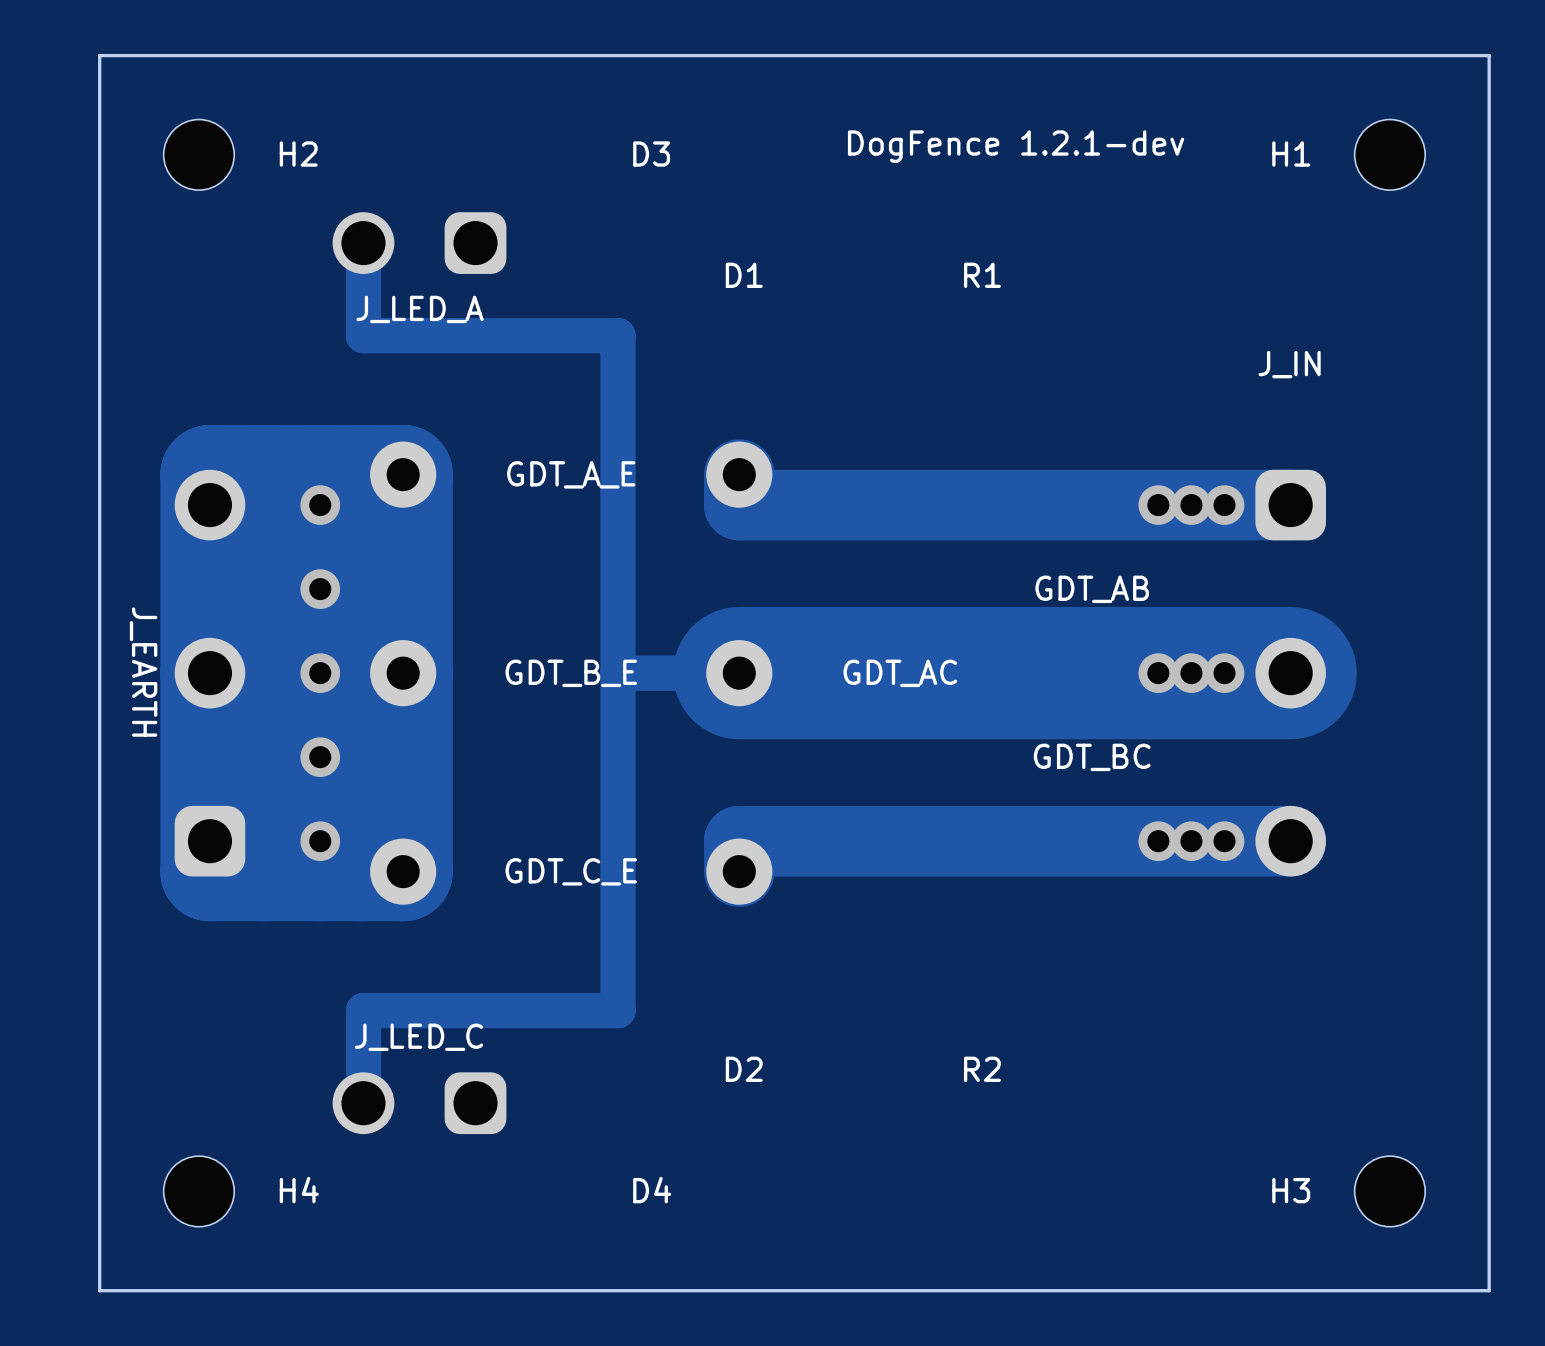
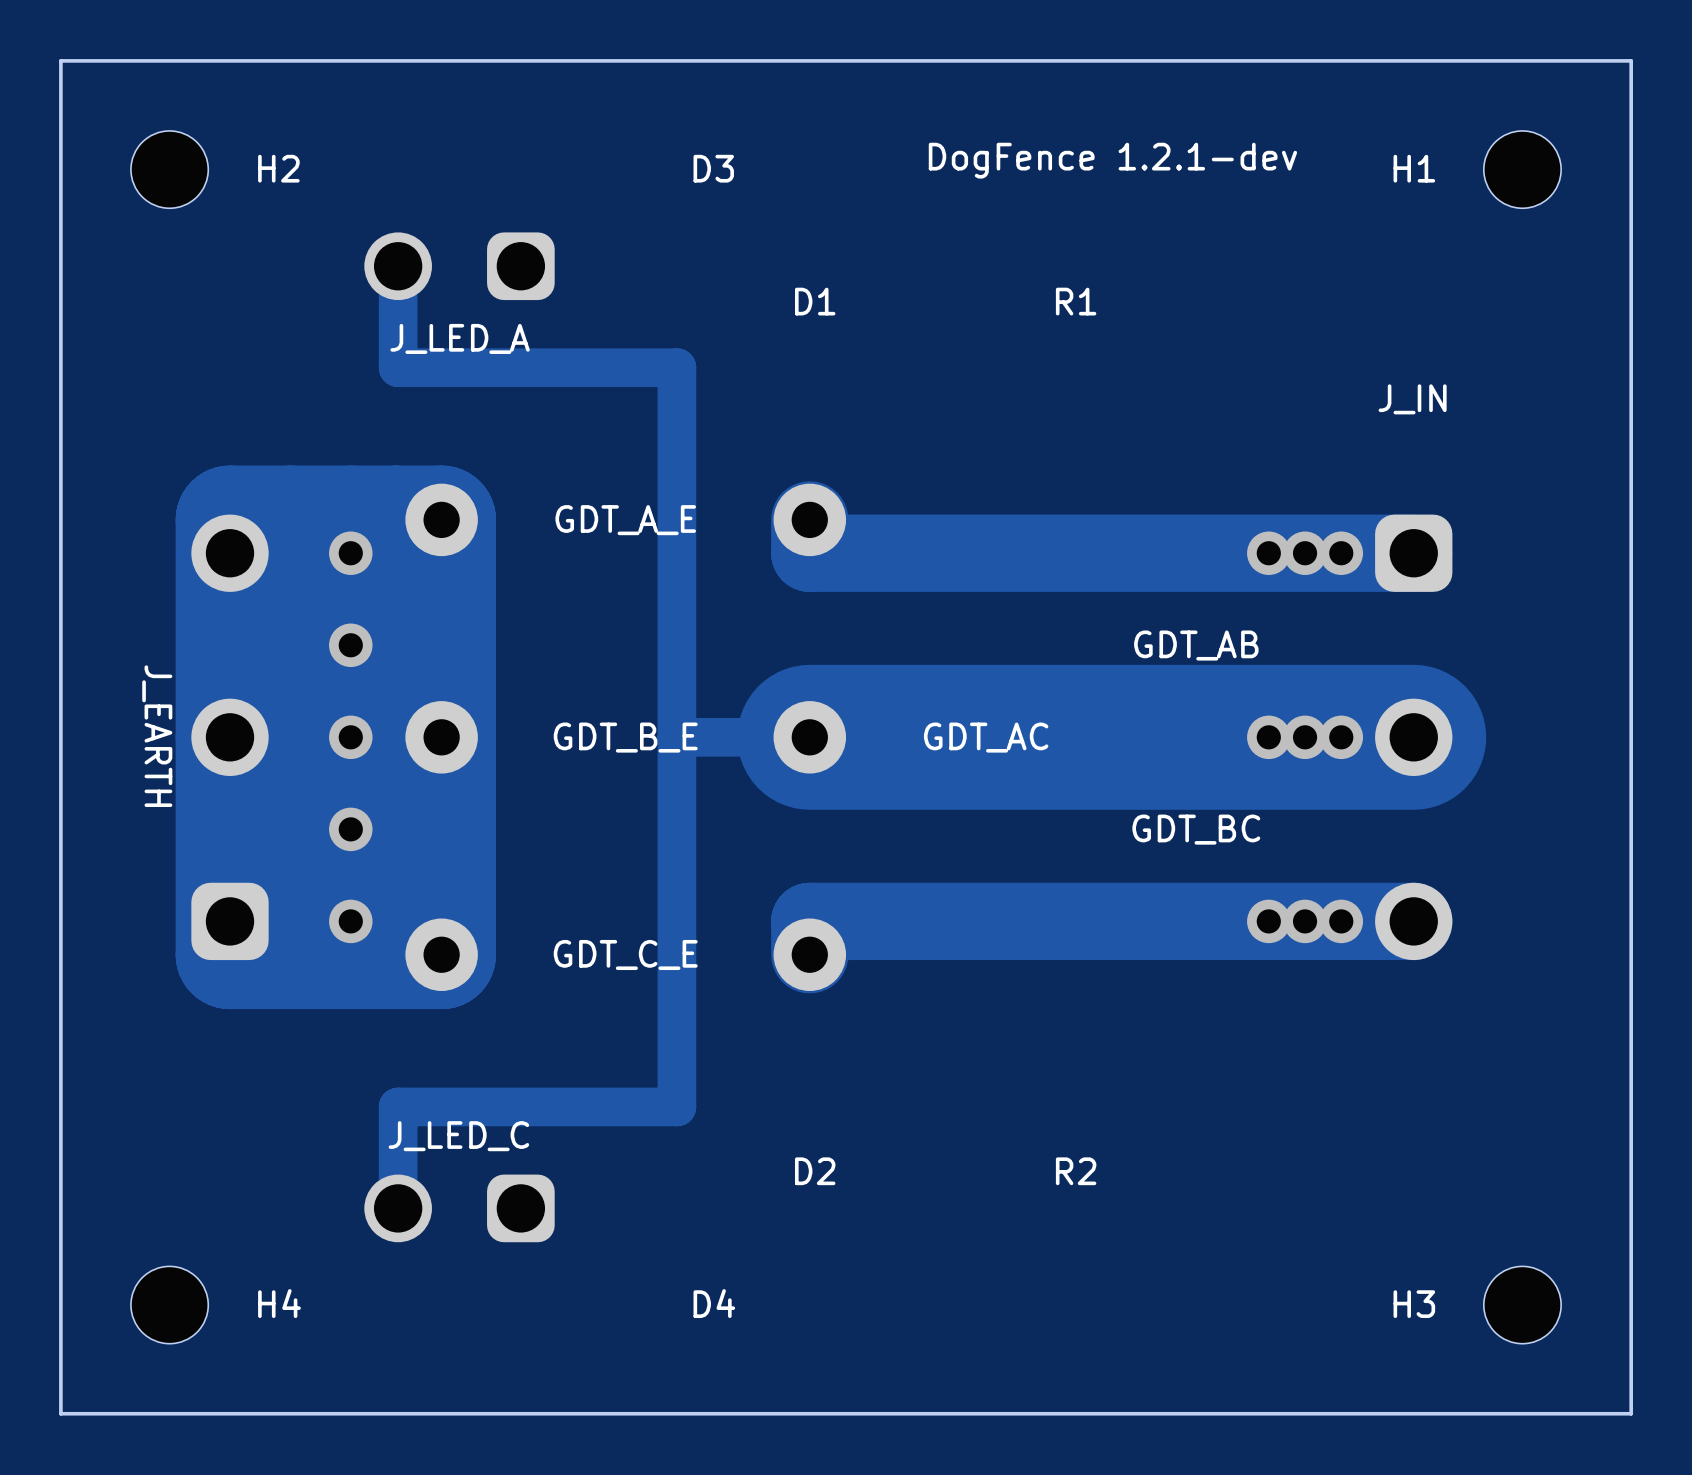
board edge: (99, 55) (99, 1290) -> (109, 60) (60, 60) (60, 1413) (109, 1413)
H2 position: (198, 154) -> (169, 169)
H4 position: (198, 1191) -> (169, 1305)

